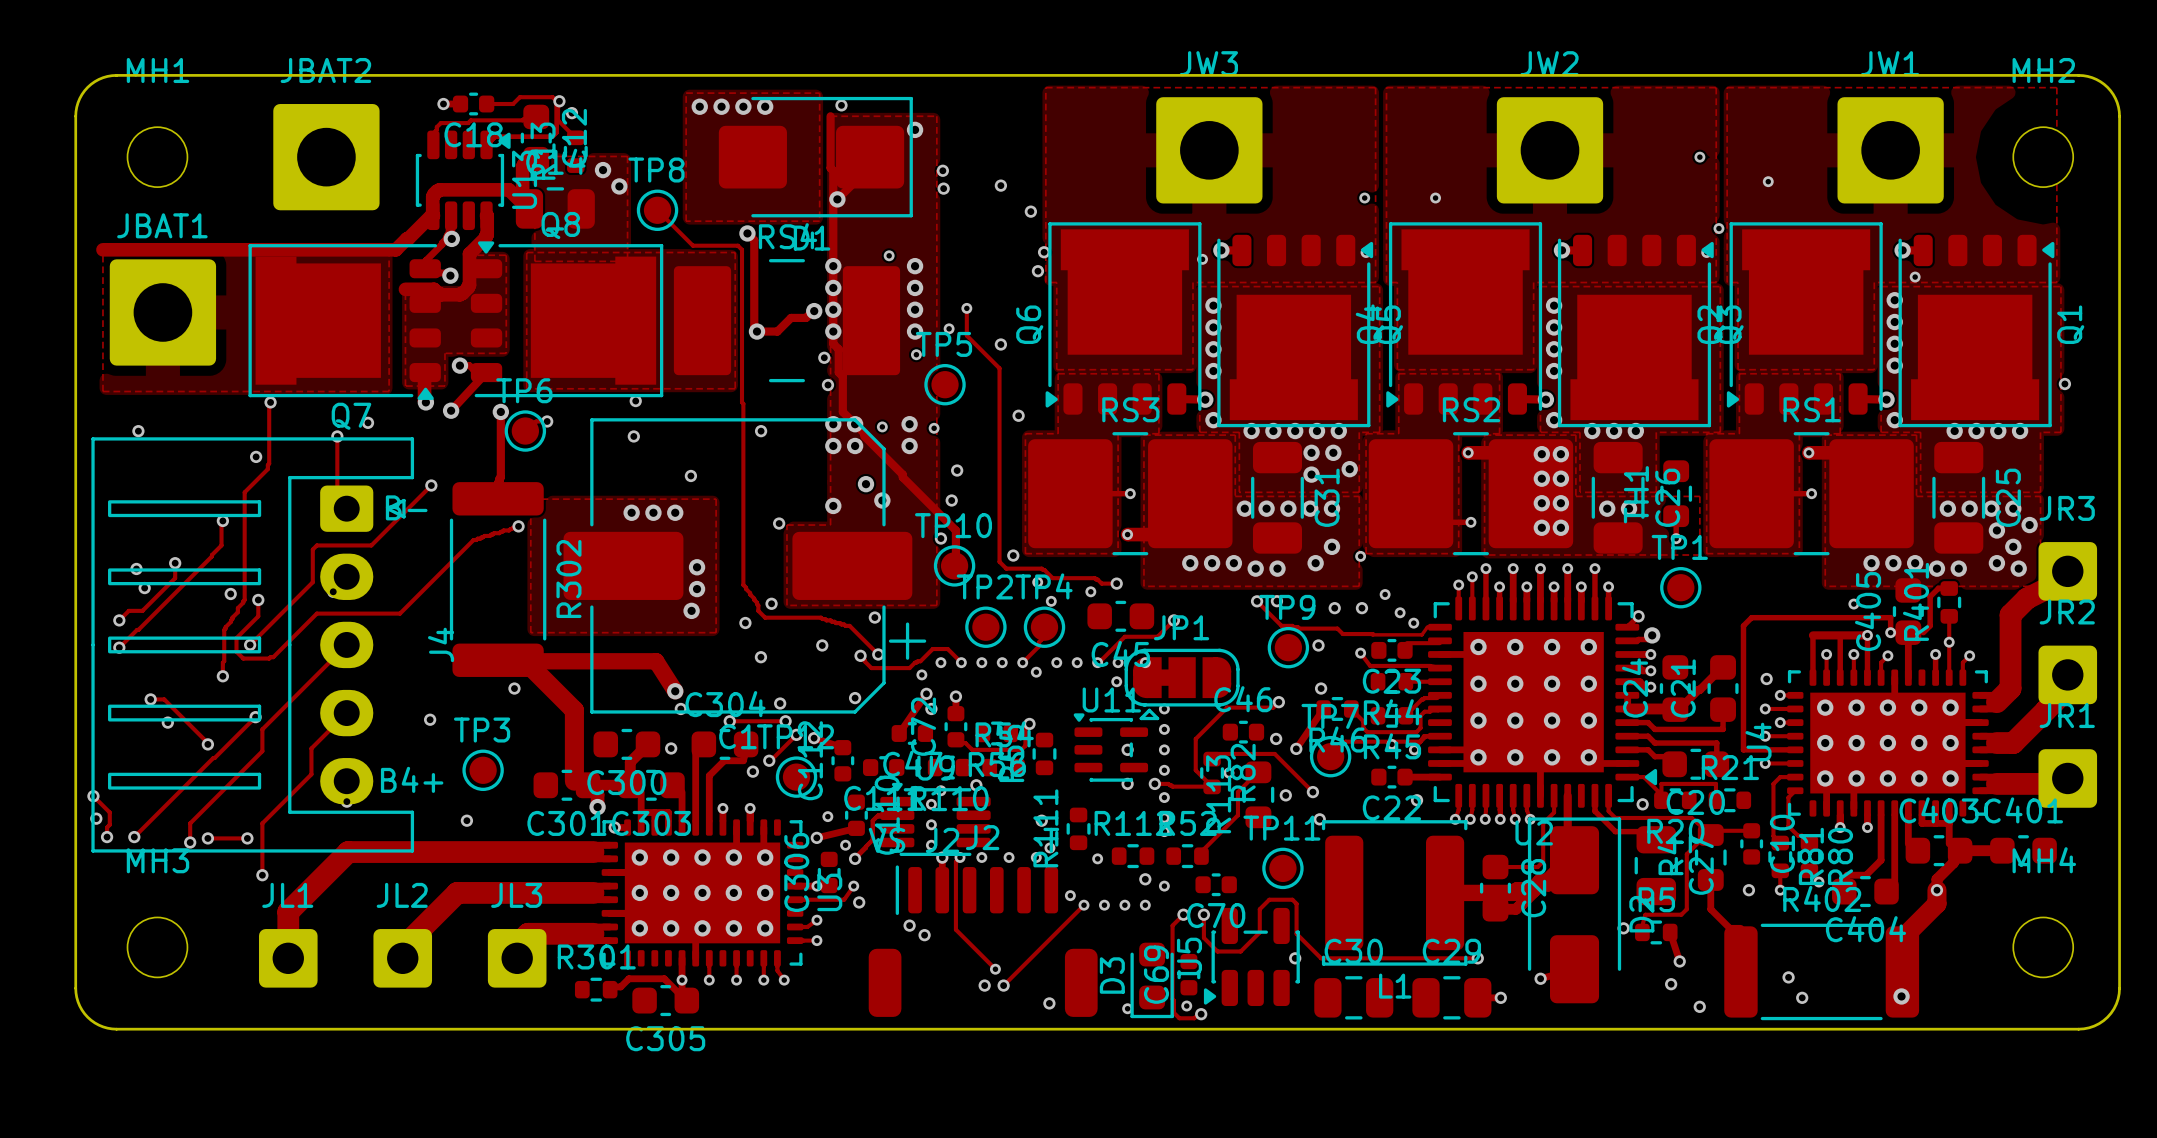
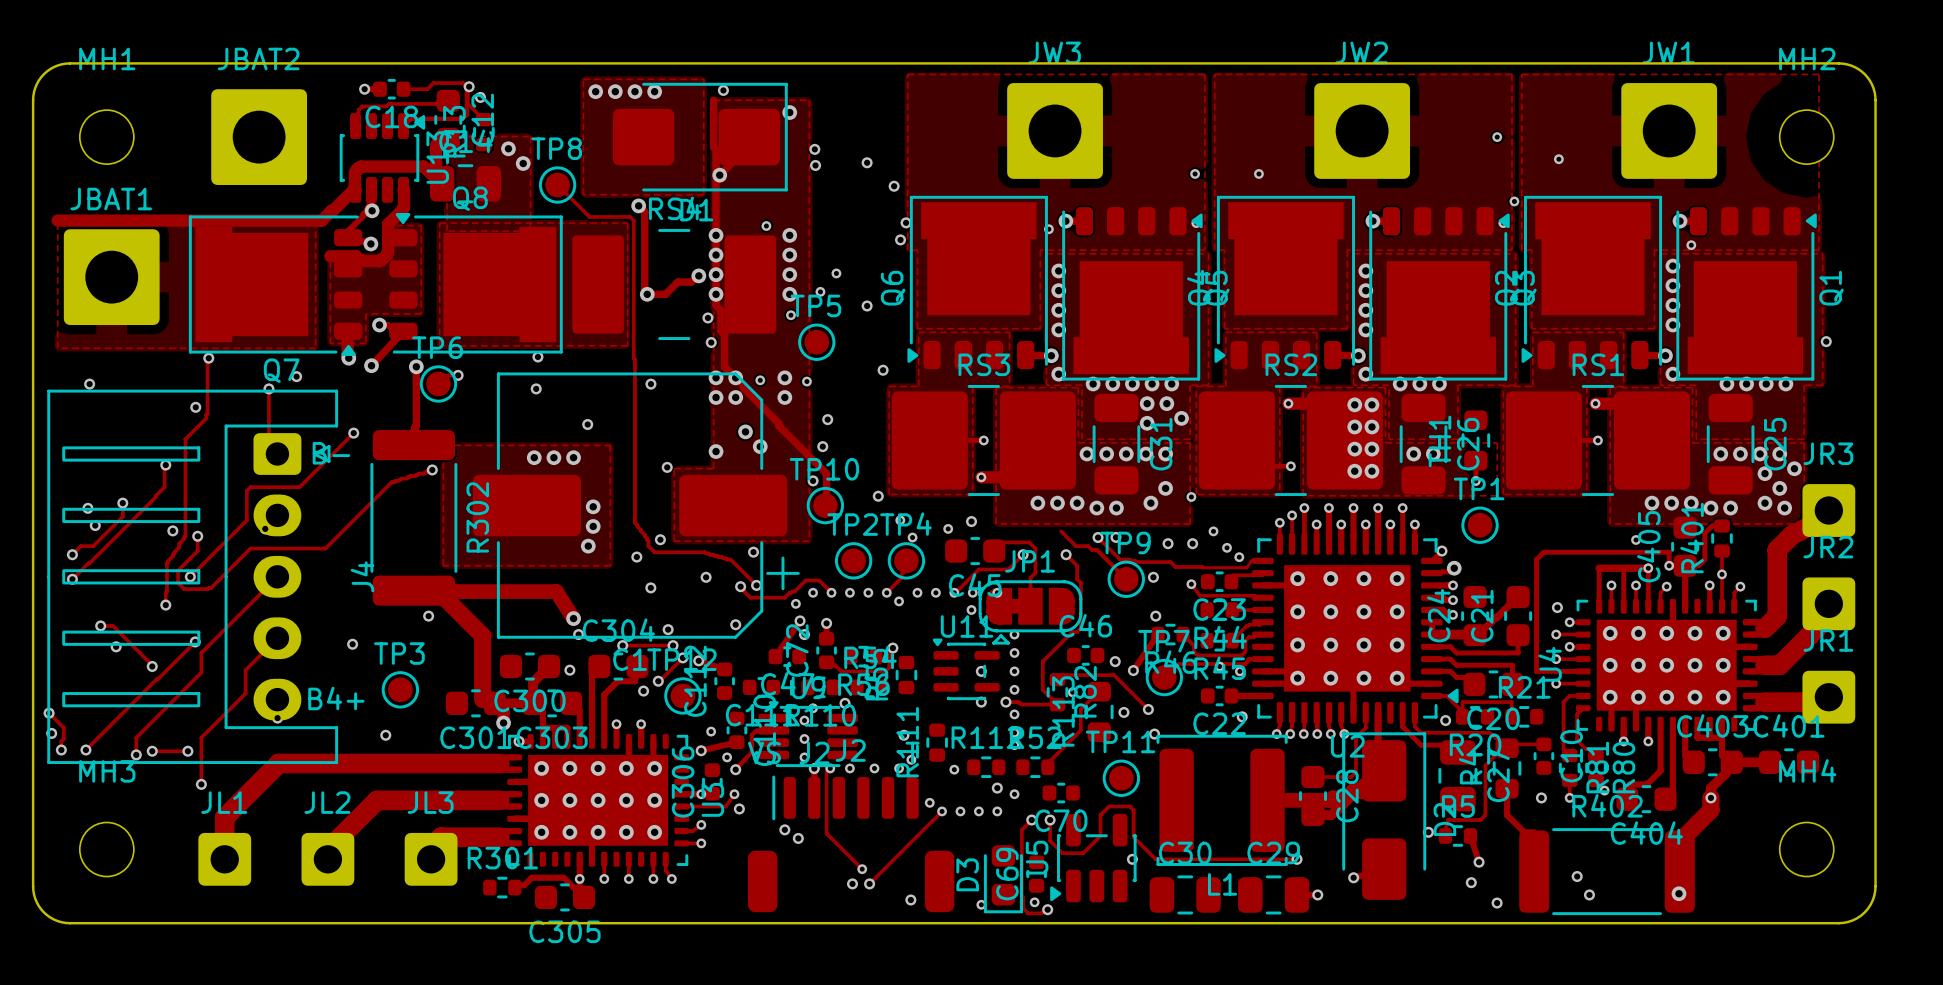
track: (966, 308) (966, 335) (999, 368) (999, 561) (1006, 568) (1041, 568) (1052, 578) (1094, 578) (1101, 583) (1116, 583) -> none
track: none -> (1061, 531) (1075, 546) (1088, 546) (1091, 549) (1096, 549) (1126, 579)
track: none -> (994, 551) (1003, 542) (1029, 542) (1035, 548) (1035, 573) (1030, 578) (1030, 606)
track: (1278, 702) (1273, 707) (1227, 707) -> (1066, 554) (1077, 565) (1077, 579) (1080, 582) (1080, 628) (1077, 632) (1071, 633)
via position: (1278, 702) -> (1066, 554)

